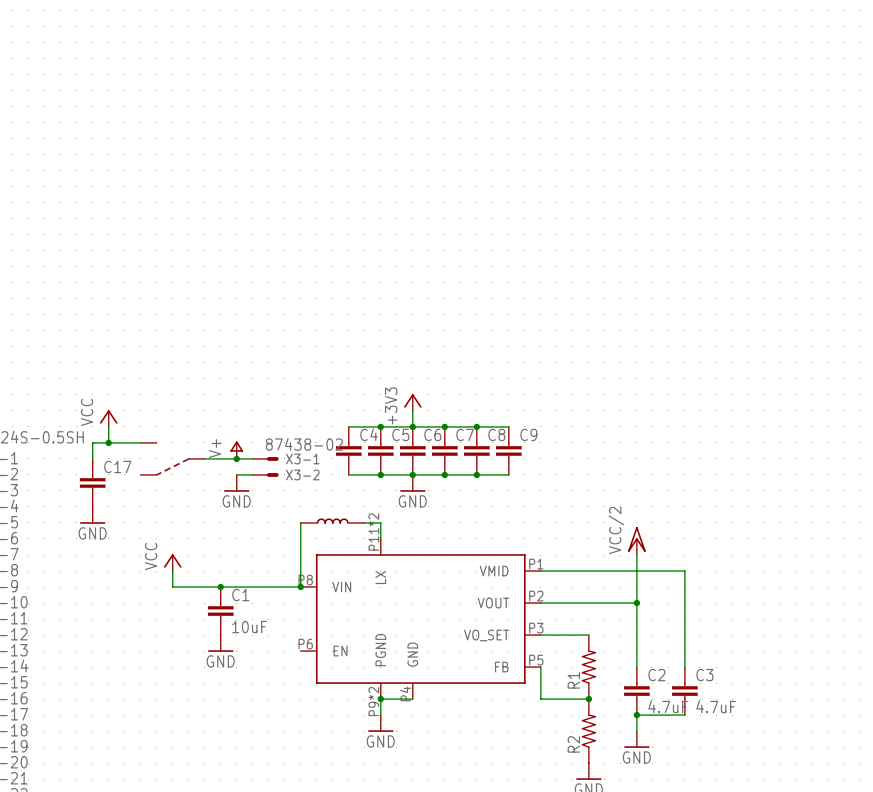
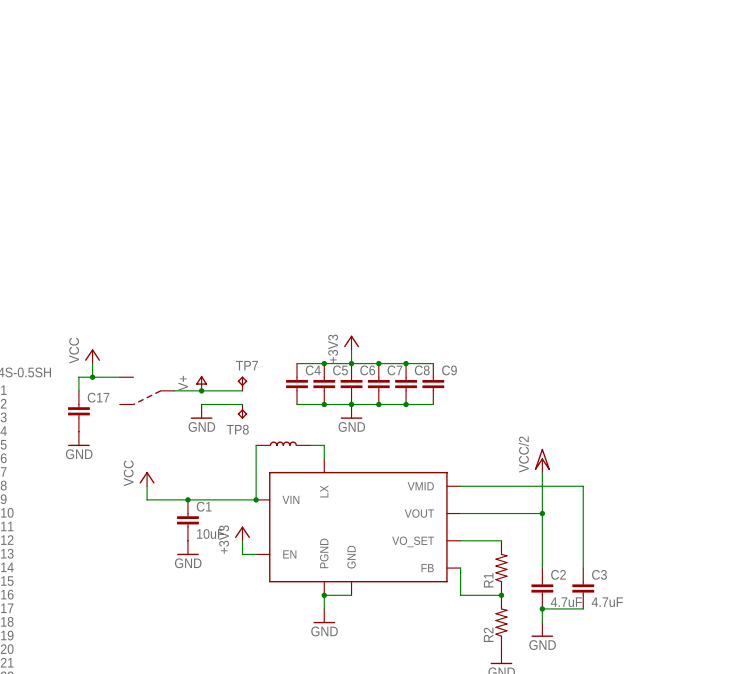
TP7: none -> (242, 383)
X3-1: 87438-02 (265, 458) -> none
X3-2: (265, 474) -> none
TP8: none -> (242, 411)
part symbol: [300, 538, 541, 700] -> [256, 459, 461, 596]
power symbol: none -> +3V3 (242, 533)
wire: none -> (242, 540) (242, 554) (256, 554)

